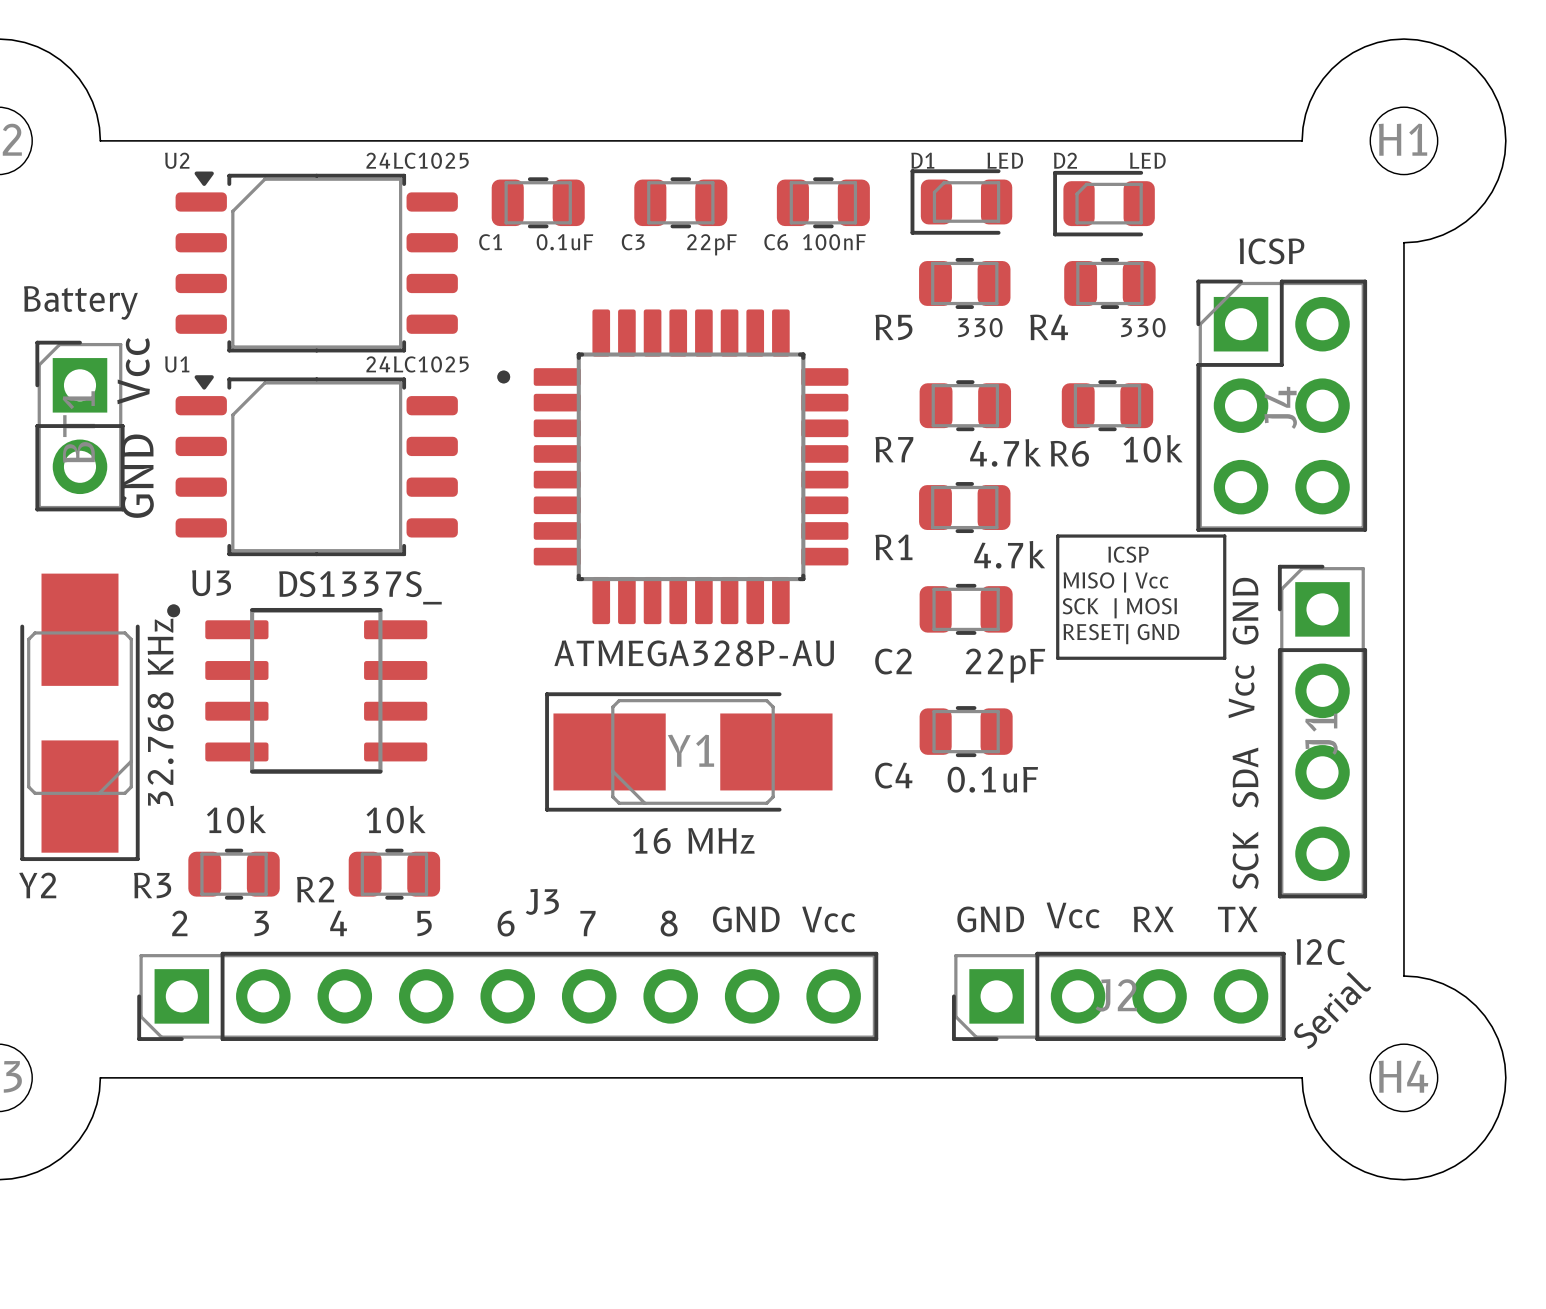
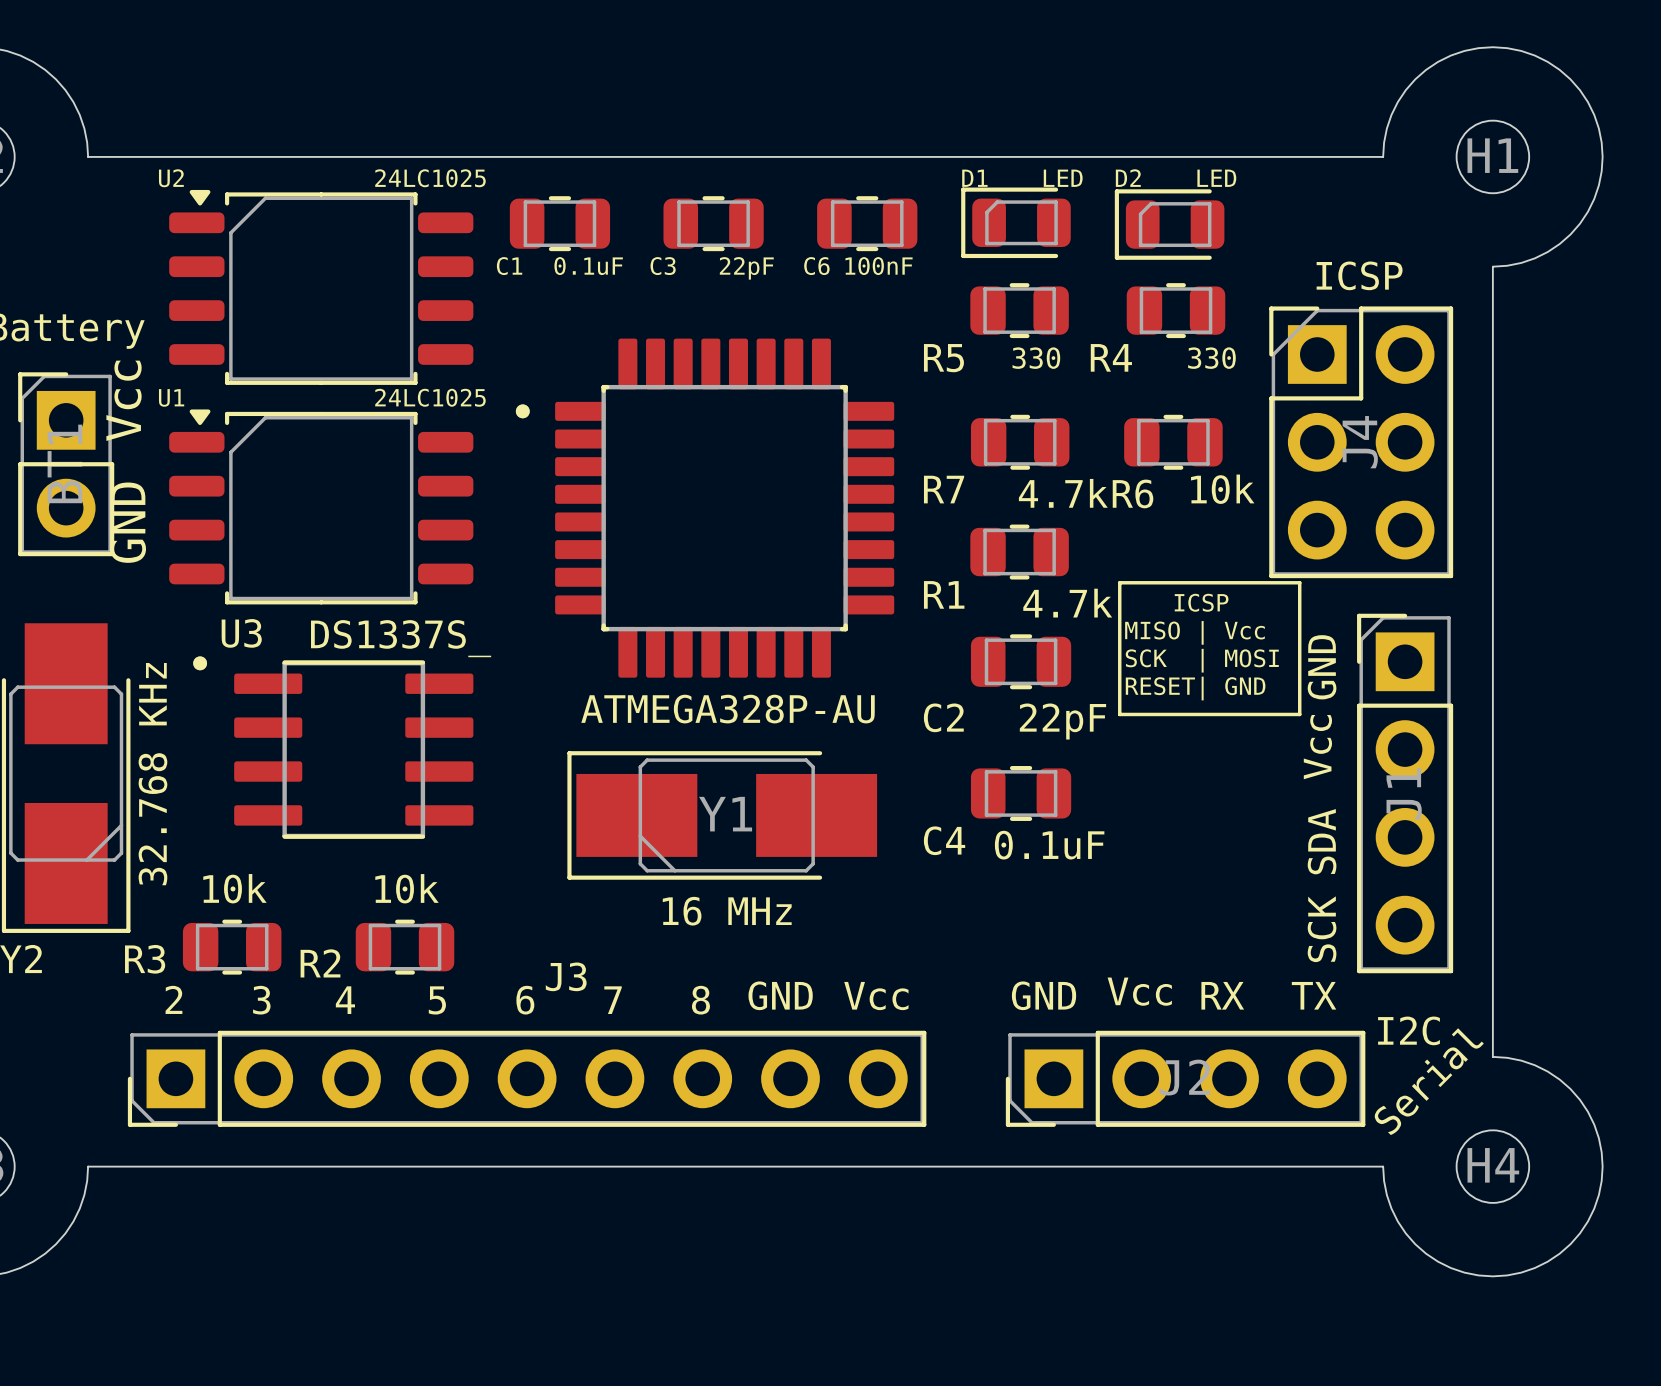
U3 position: (297, 689) -> (333, 747)

